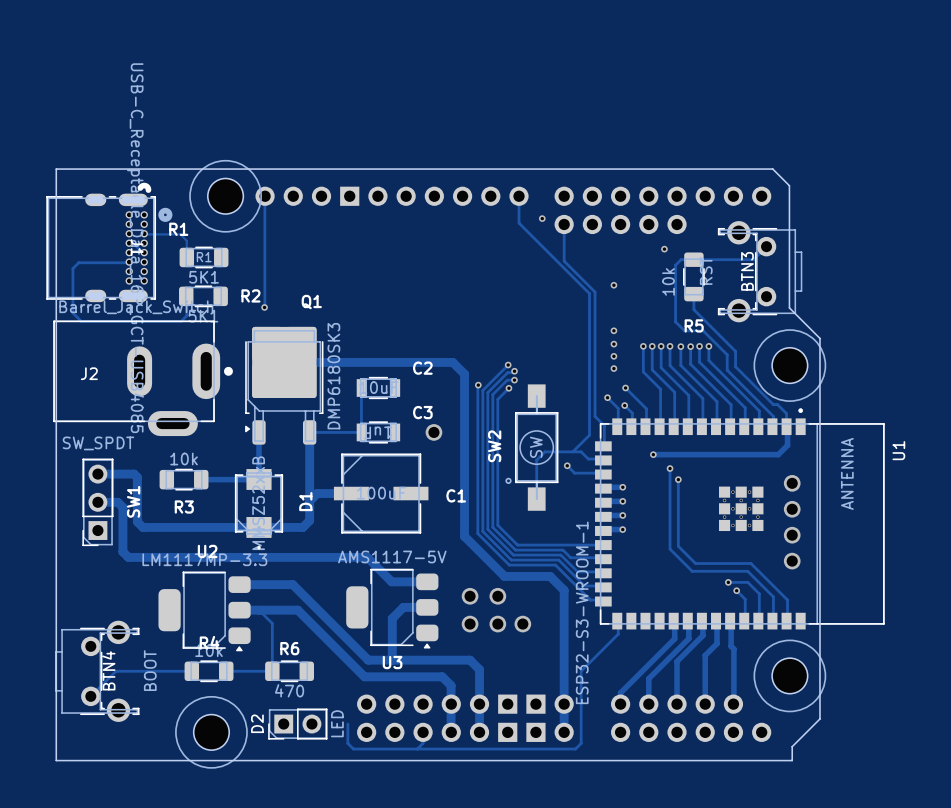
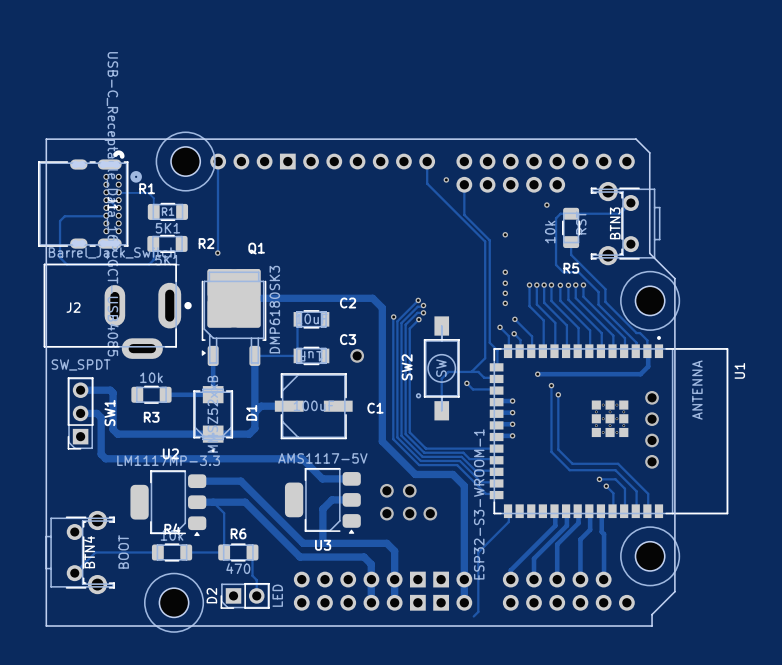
track: none -> (252, 552) (252, 575) (256, 580) (256, 595)
track: (347, 724) (347, 743) (353, 749) (575, 749) -> none
track: (423, 732) (423, 743) (417, 749) -> none

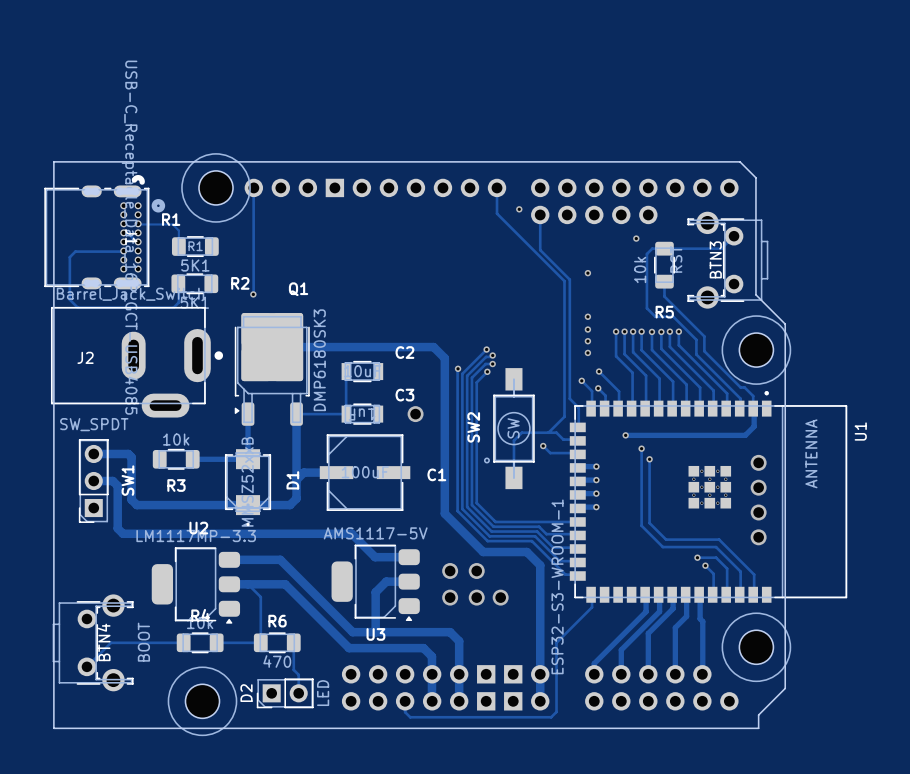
track: none -> (405, 701) (405, 712) (410, 717) (551, 717)

